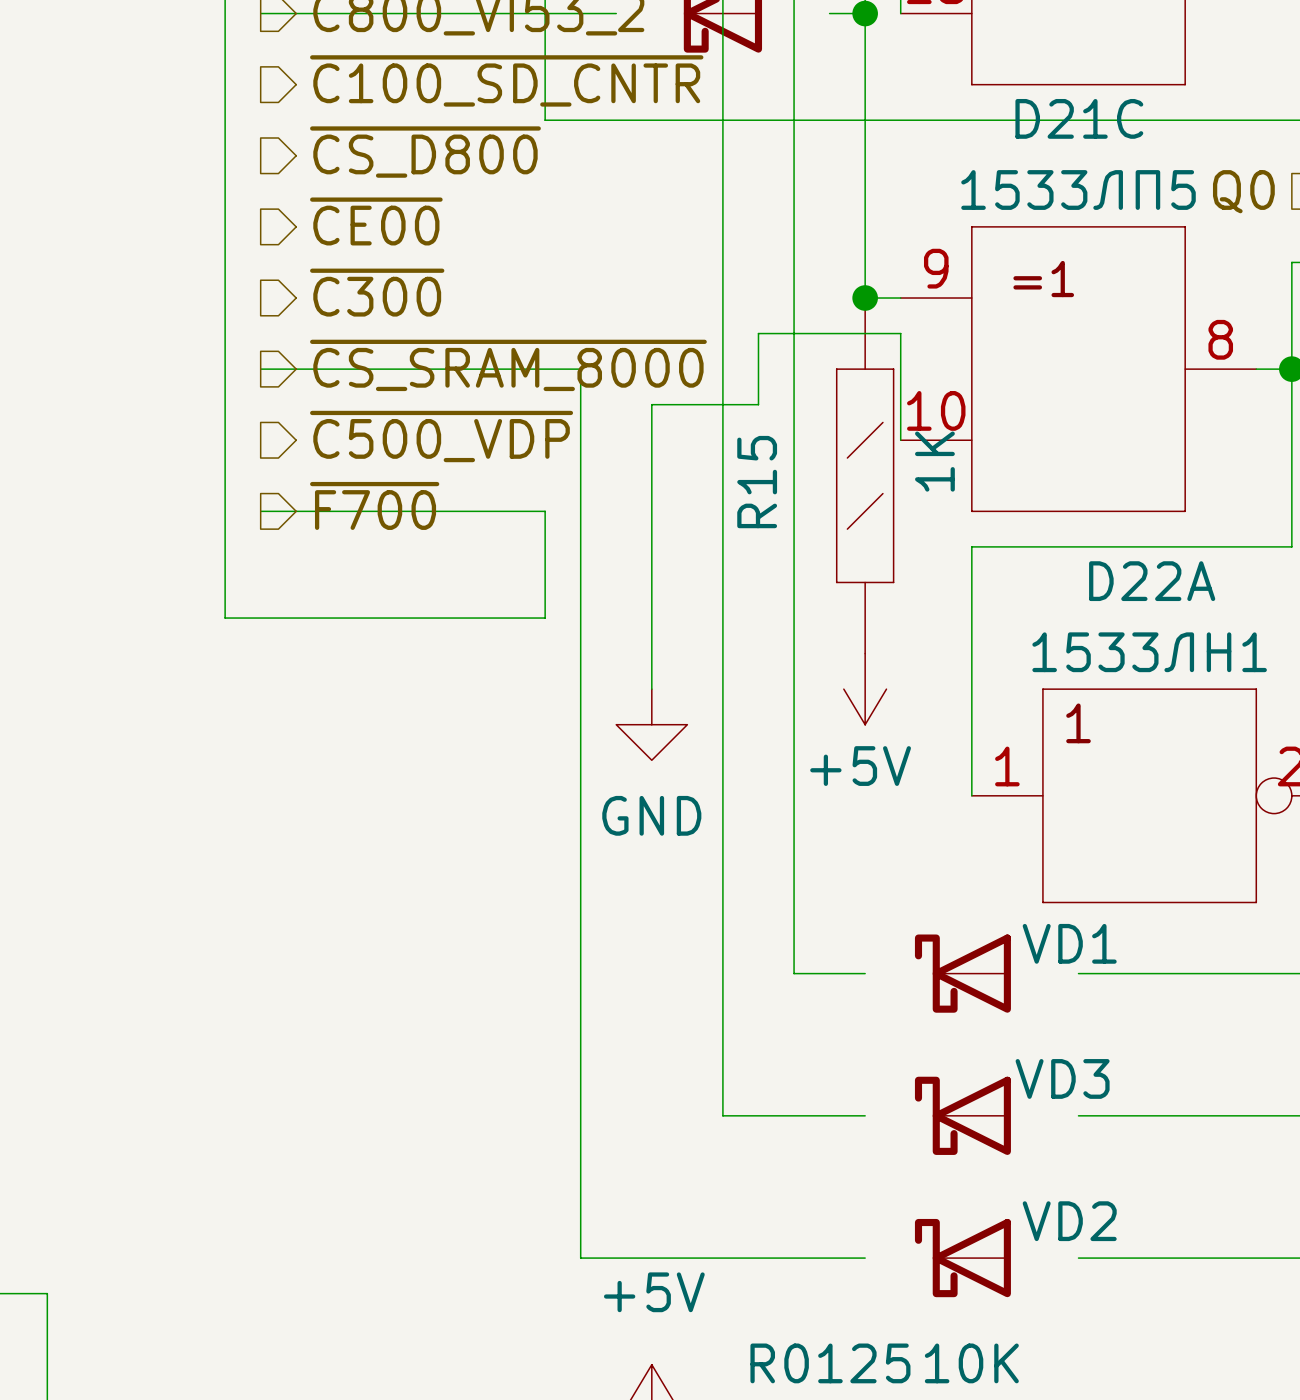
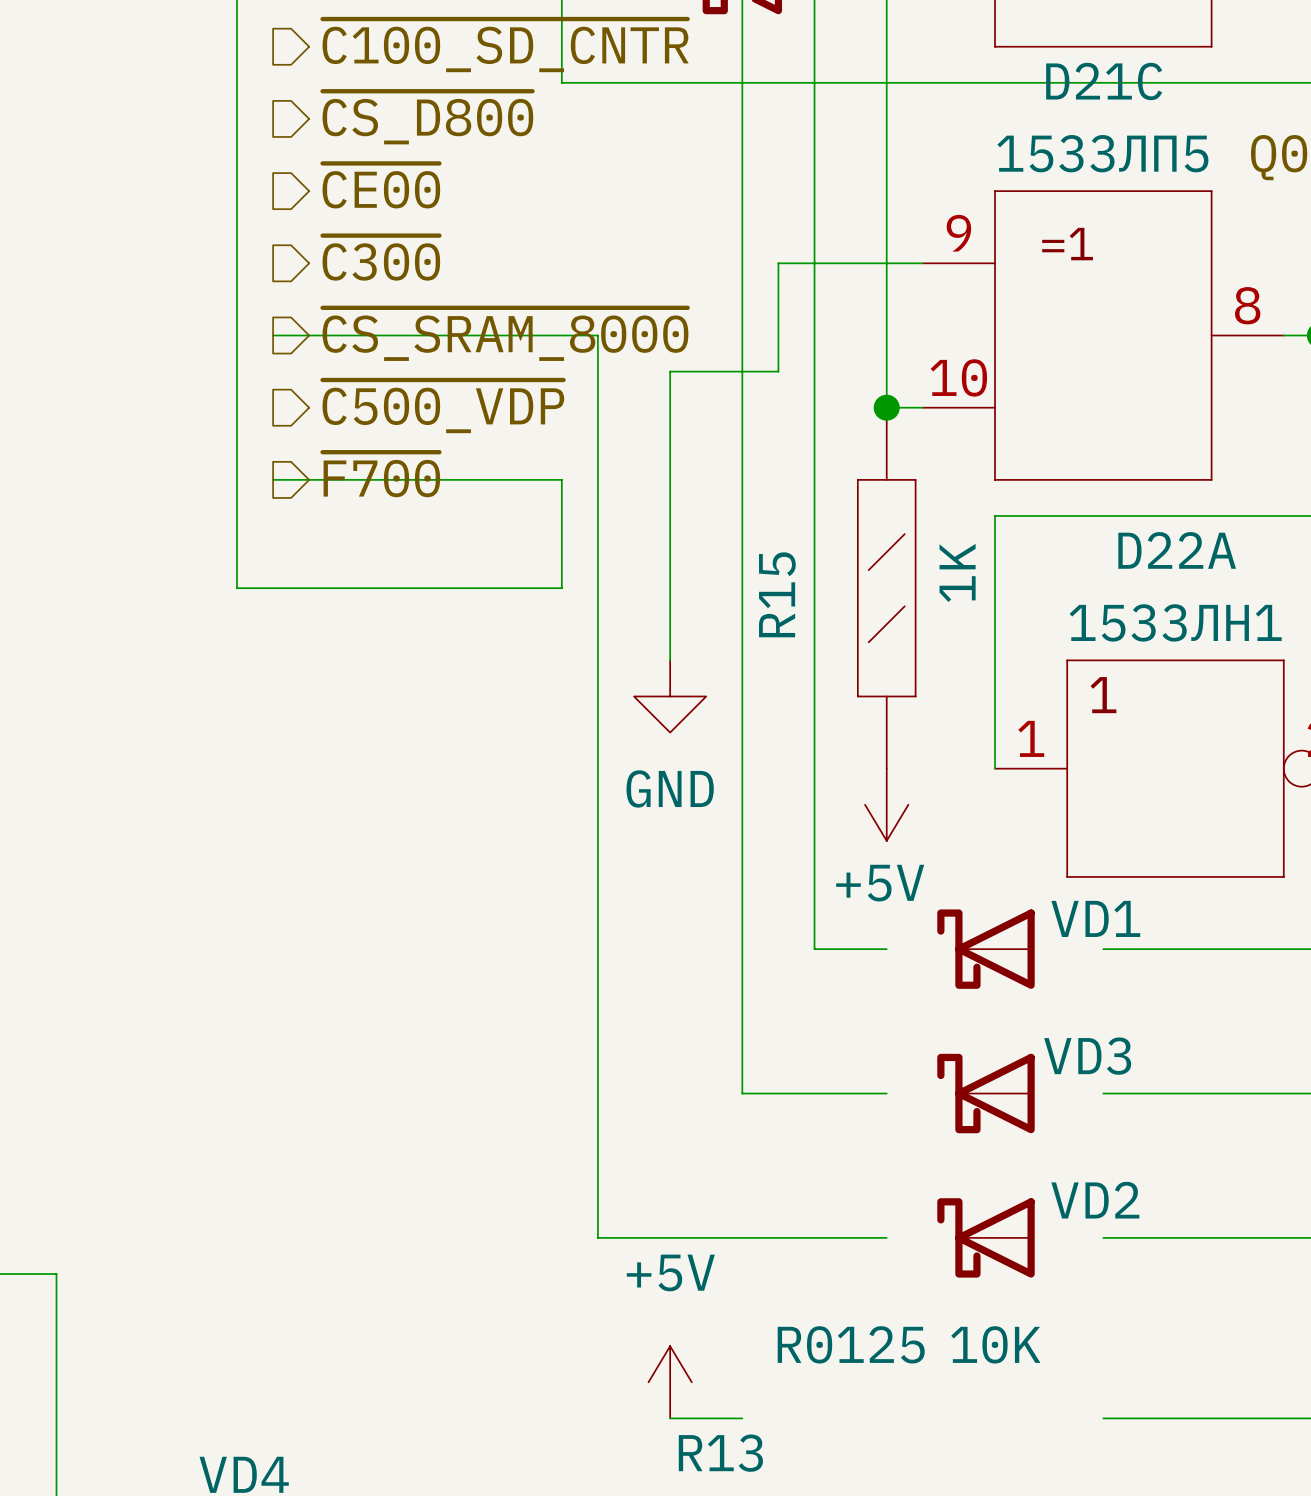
junction position: (865, 298) -> (886, 407)
wire: (758, 333) (900, 333) (900, 440) -> (778, 299) (778, 263) (886, 263) (886, 407) (922, 407)
R15 position: (865, 475) -> (886, 588)
power symbol position: +5V (865, 689) -> +5V (886, 804)

